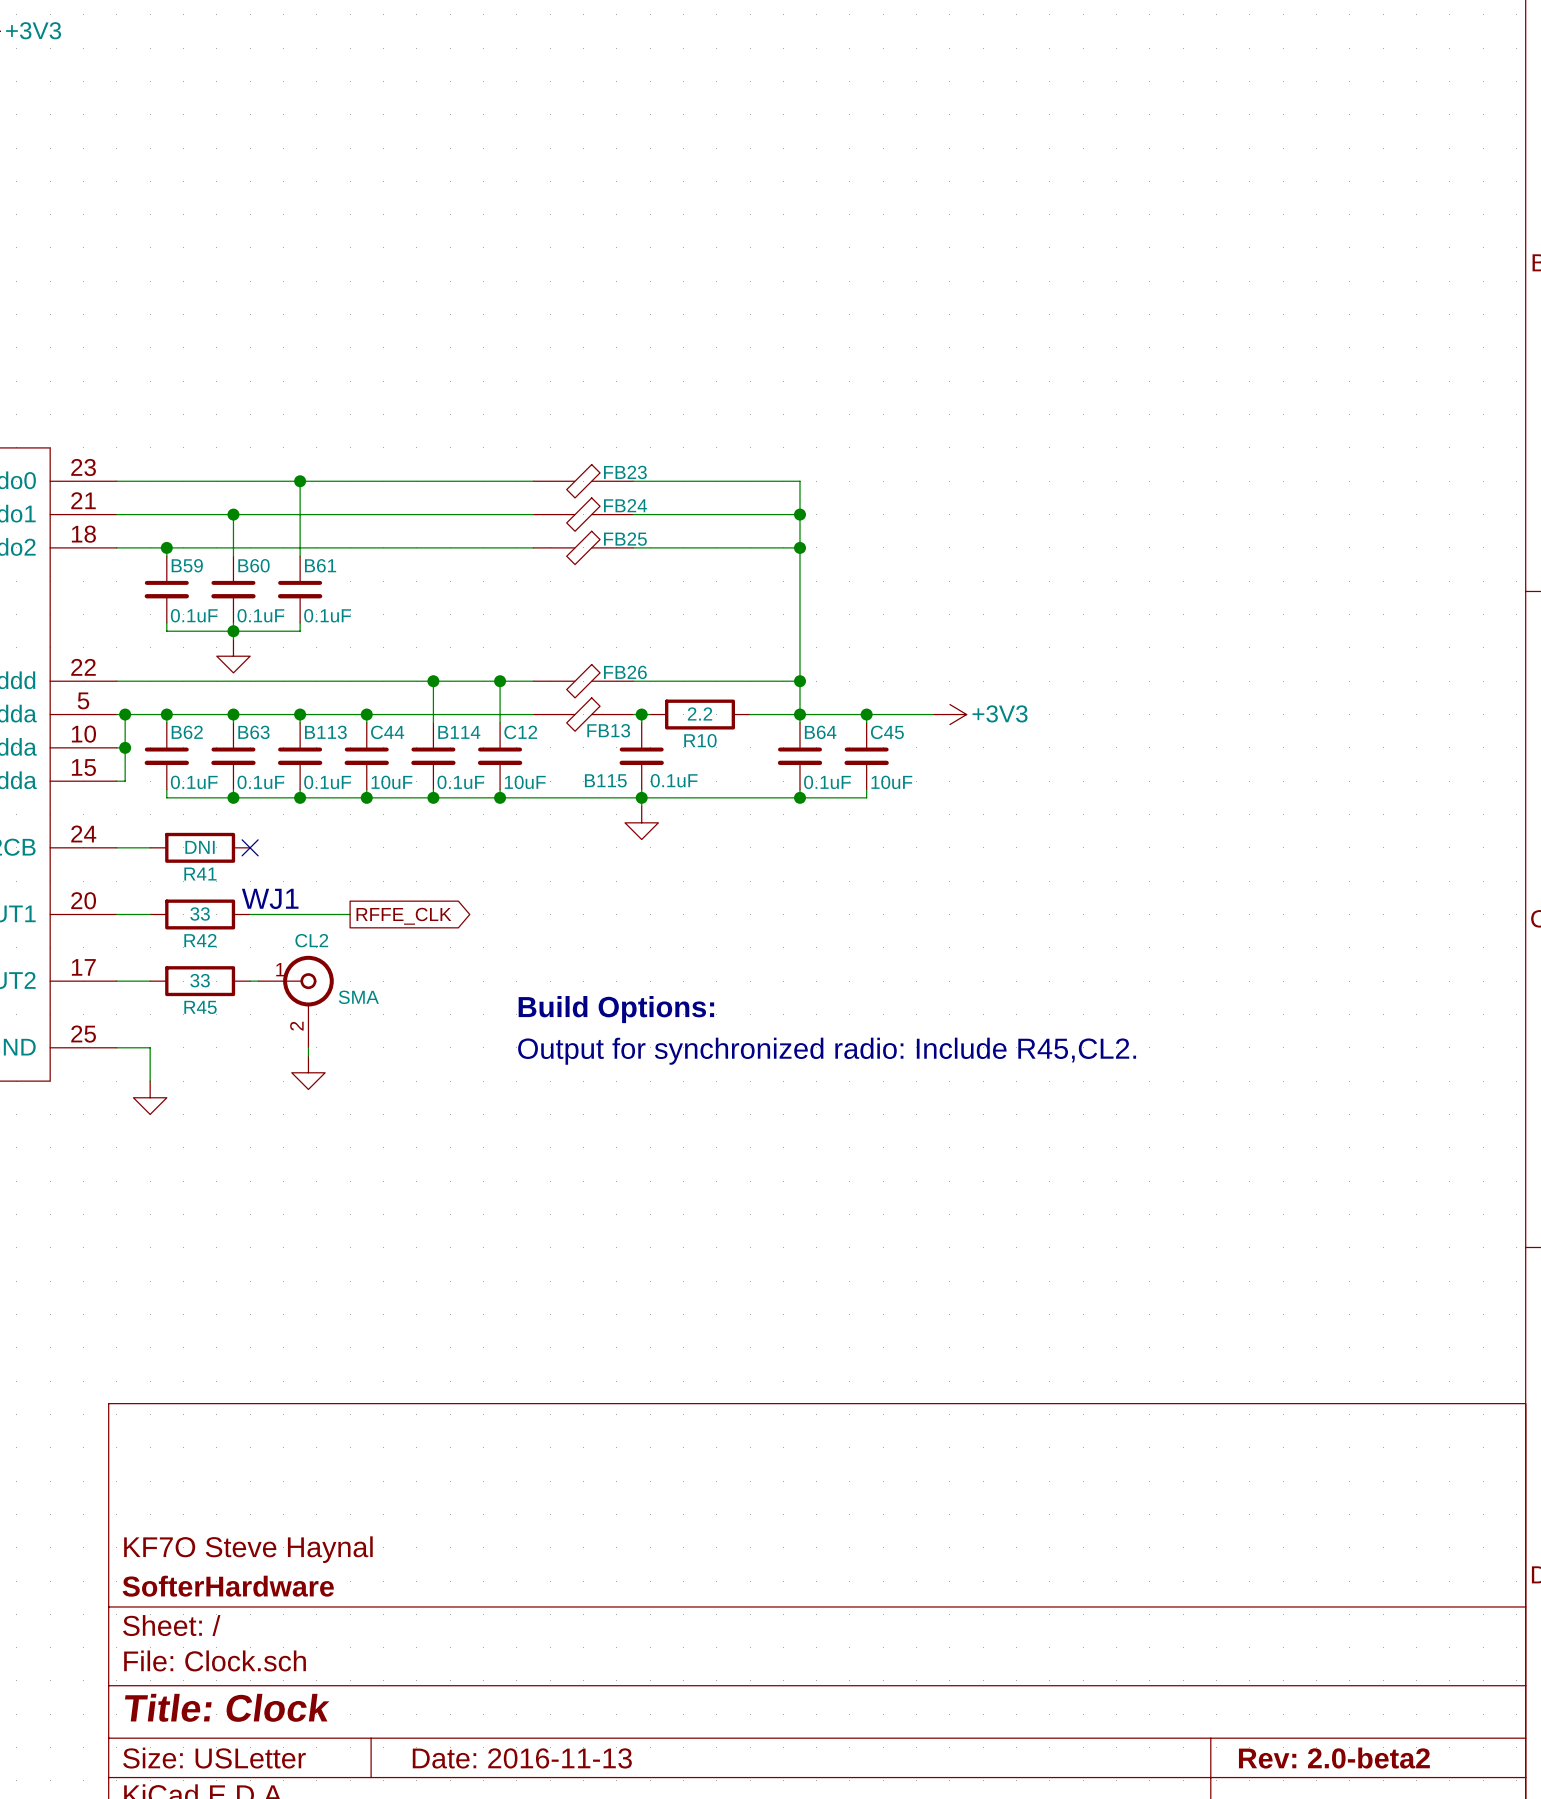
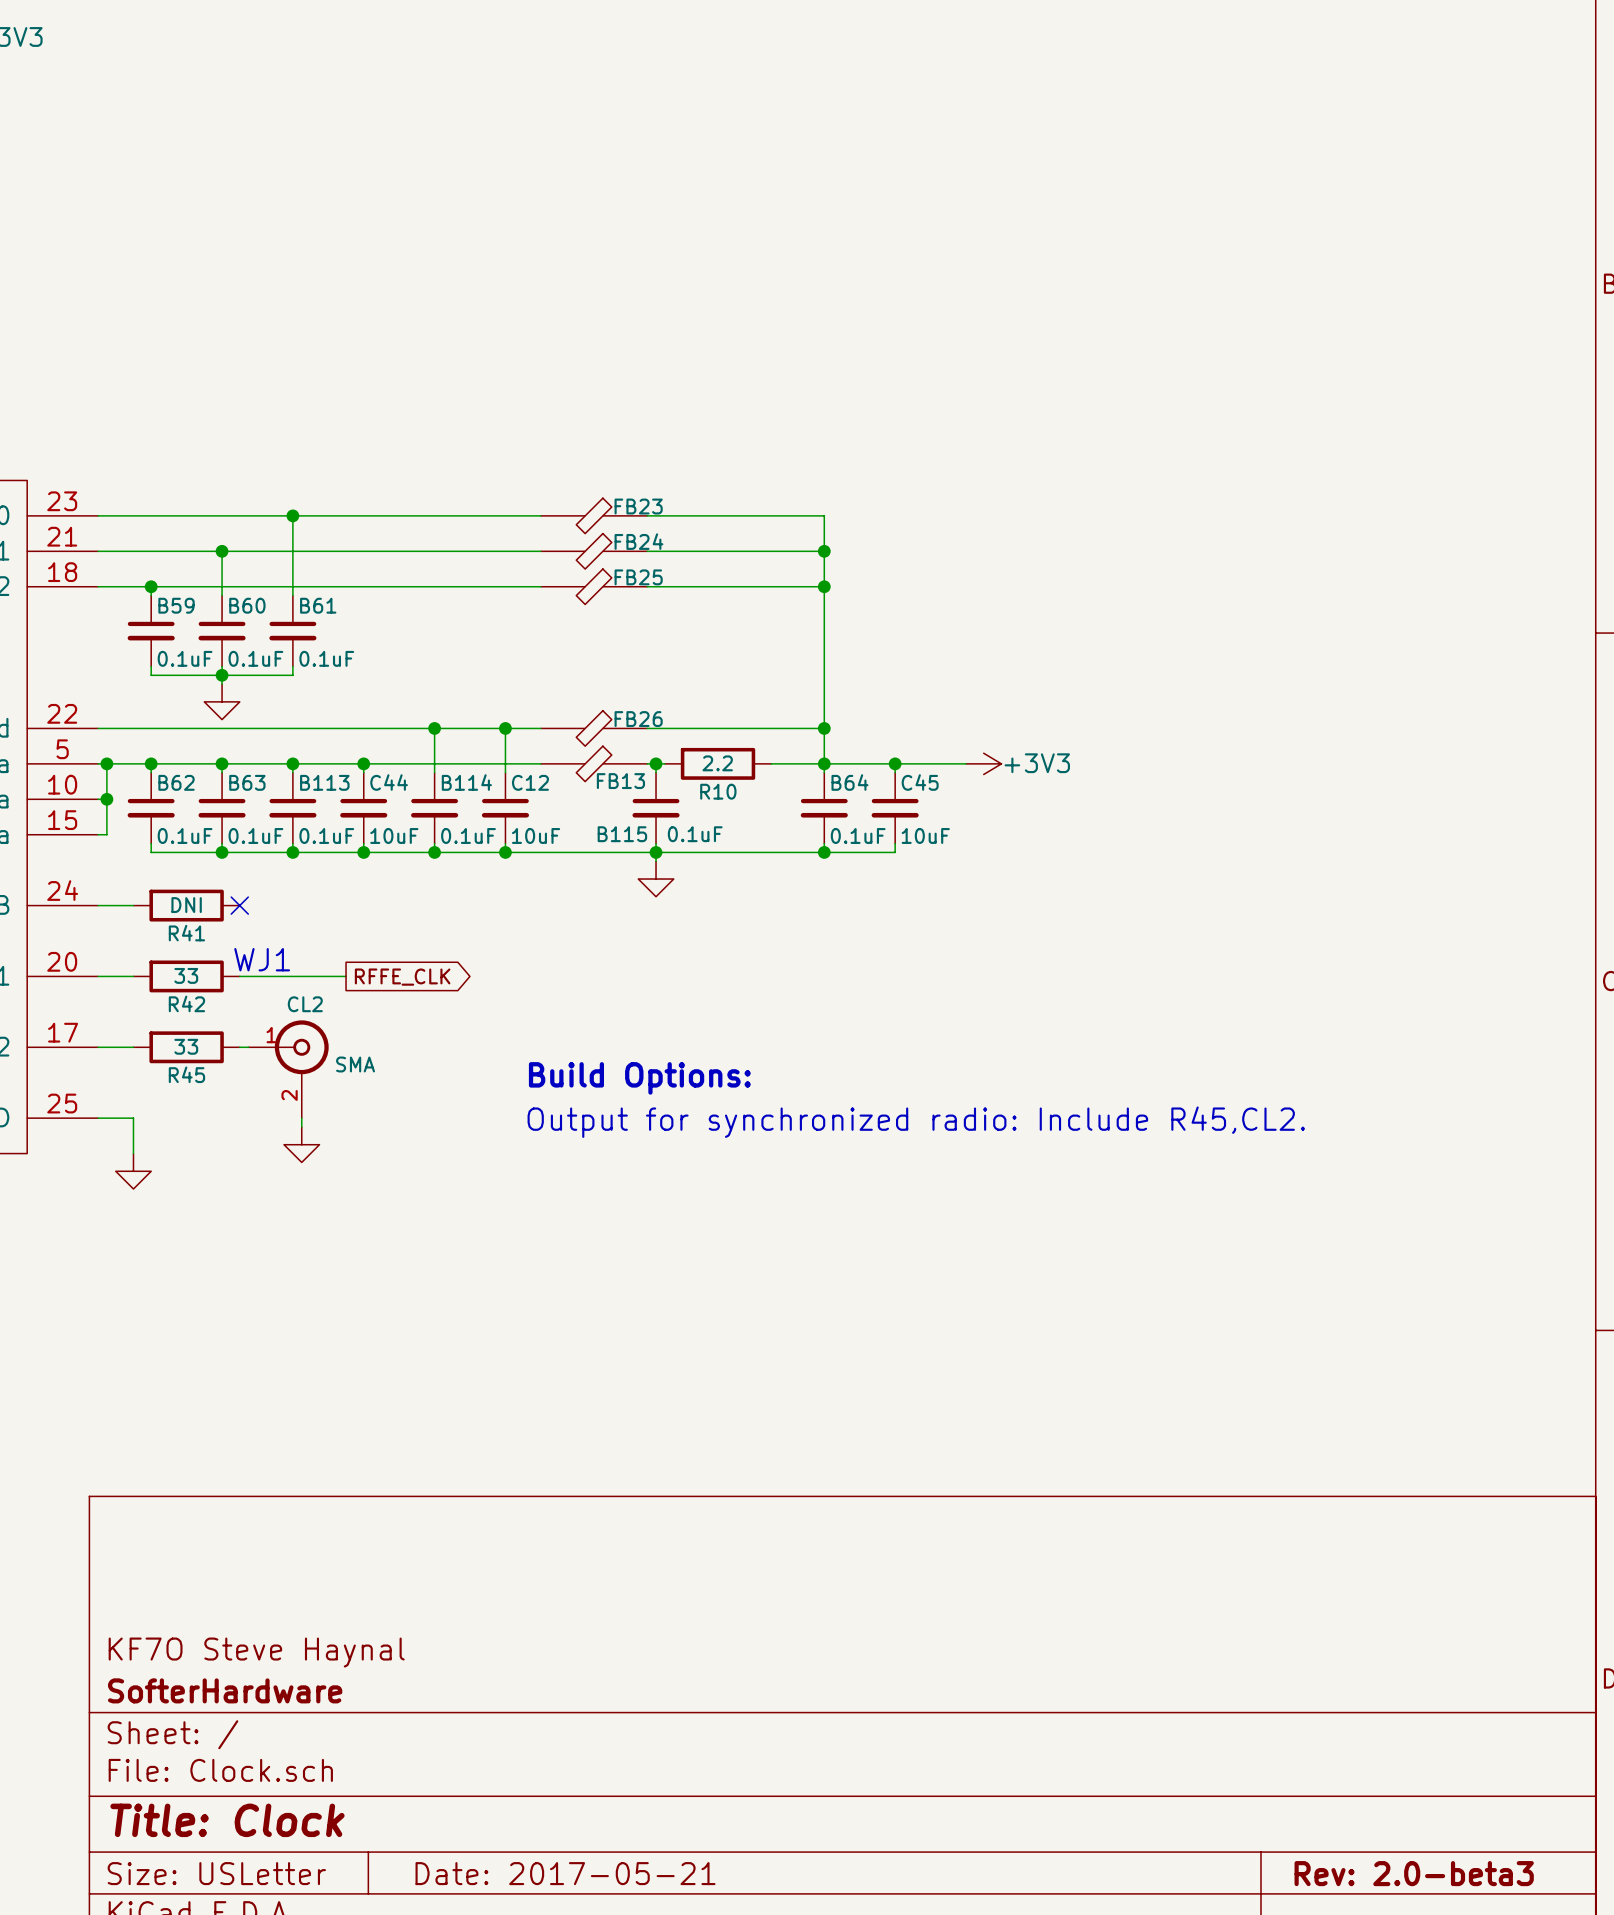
title block: Date: 2016-11-13 (522, 1758) -> Date: 2017-05-21 (565, 1873)
title block: Rev: 2.0-beta2 (1334, 1758) -> Rev: 2.0-beta3 (1414, 1873)

